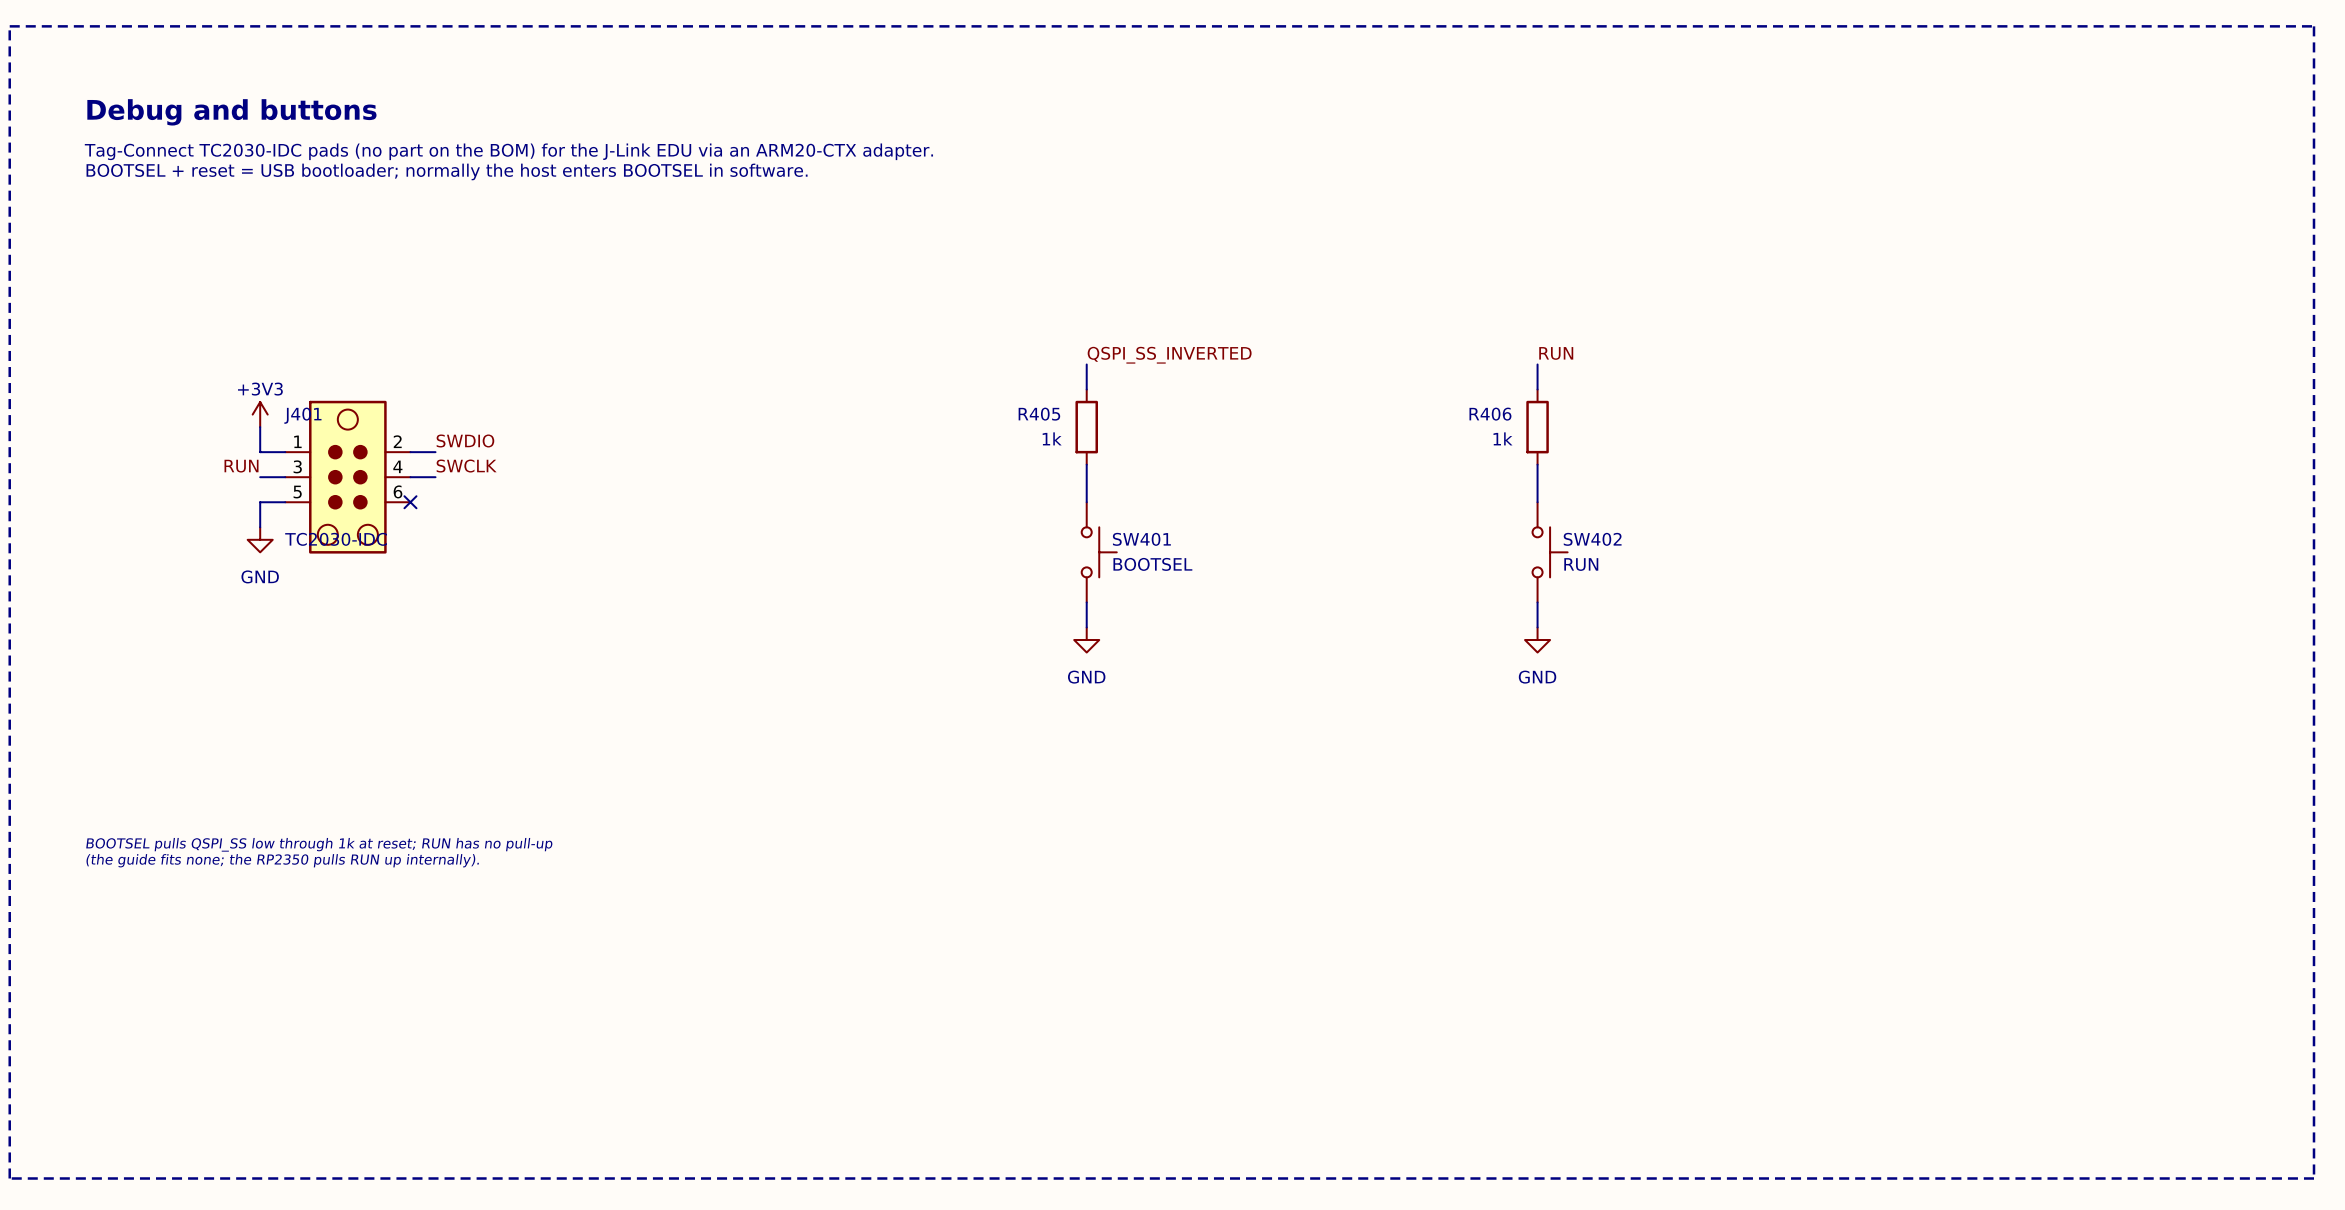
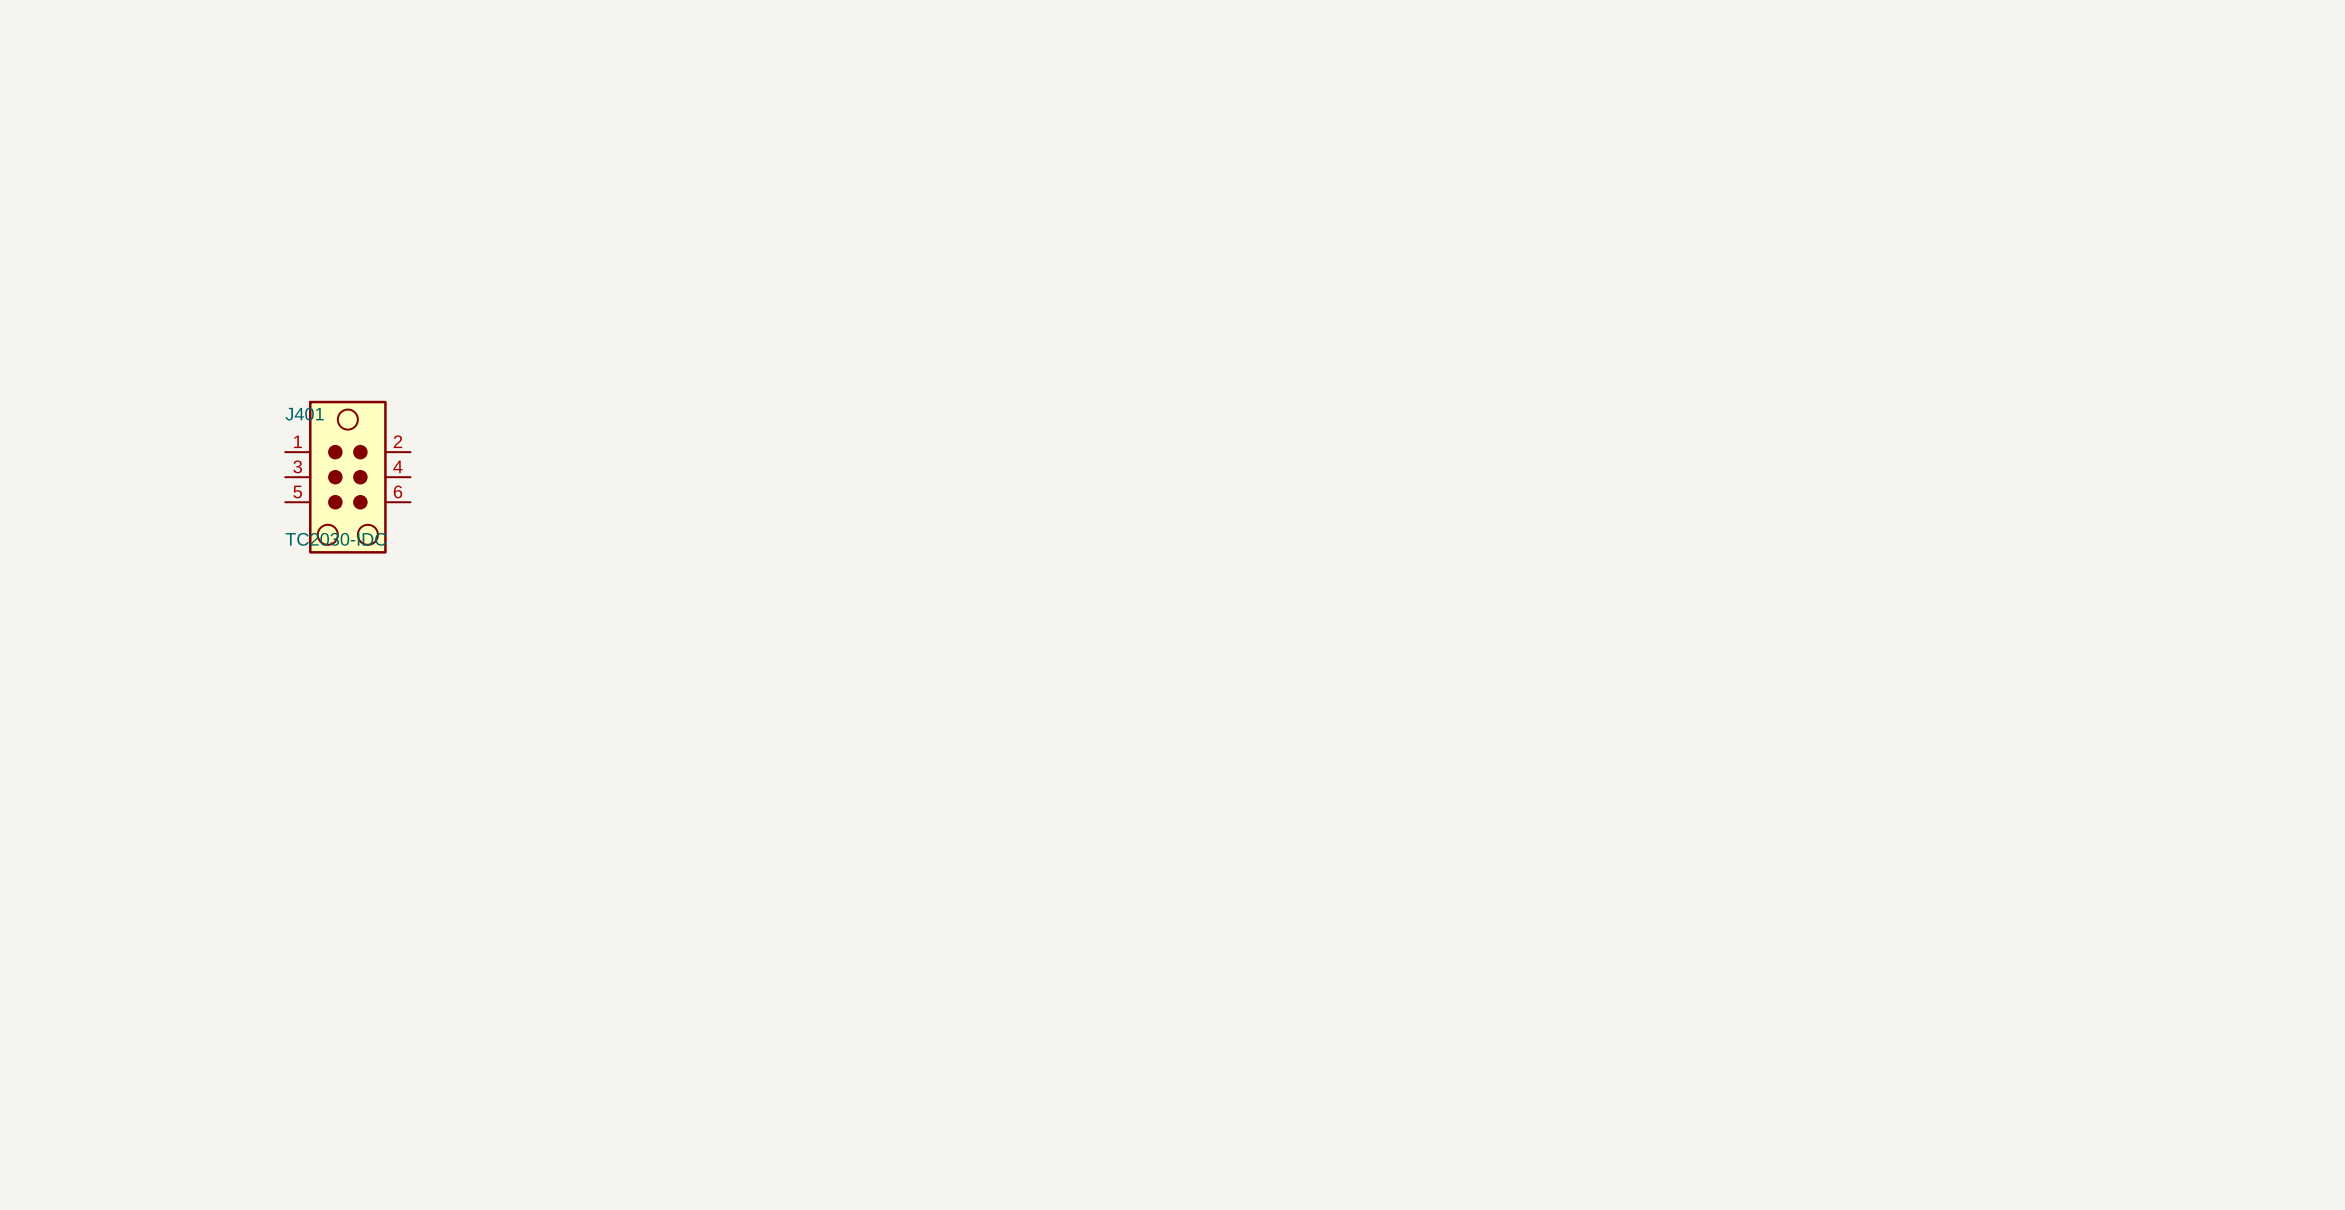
line: (9, 26) (2313, 26) (2313, 1178) (9, 1178) (9, 26) -> none
text: Debug and buttons (231, 112) -> none
text: Tag-Connect TC2030-IDC pads (no part on the BOM) for the J-Link EDU via an ARM20-CTX adapter. (508, 151) -> none
text: BOOTSEL + reset = USB bootloader; normally the host enters BOOTSEL in software. (447, 171) -> none
label: RUN (1556, 353) -> none
label: QSPI_SS_INVERTED (1169, 355) -> none
wire: (1086, 364) (1086, 389) -> none
wire: (1537, 364) (1537, 389) -> none
power symbol: +3V3 (260, 414) -> none
wire: (260, 427) (260, 452) (285, 452) -> none
R405: 1k (1086, 427) -> none
R406: 1k (1537, 427) -> none
label: SWDIO (465, 440) -> none
wire: (410, 452) (435, 452) -> none
wire: (1086, 464) (1086, 502) -> none
wire: (1537, 464) (1537, 502) -> none
label: RUN (241, 466) -> none
label: SWCLK (466, 466) -> none
wire: (260, 477) (285, 477) -> none
wire: (410, 477) (435, 477) -> none
wire: (285, 502) (260, 502) (260, 527) -> none
no-connect mark: (410, 502) -> none
power symbol: GND (260, 539) -> none
SW401: BOOTSEL (1099, 552) -> none
SW402: RUN (1550, 552) -> none
wire: (1086, 602) (1086, 627) -> none
wire: (1537, 602) (1537, 627) -> none
power symbol: GND (1086, 640) -> none
power symbol: GND (1537, 640) -> none
text: BOOTSEL pulls QSPI_SS low through 1k at reset; RUN has no pull-up (319, 844) -> none
text: (the guide fits none; the RP2350 pulls RUN up internally). (282, 860) -> none

